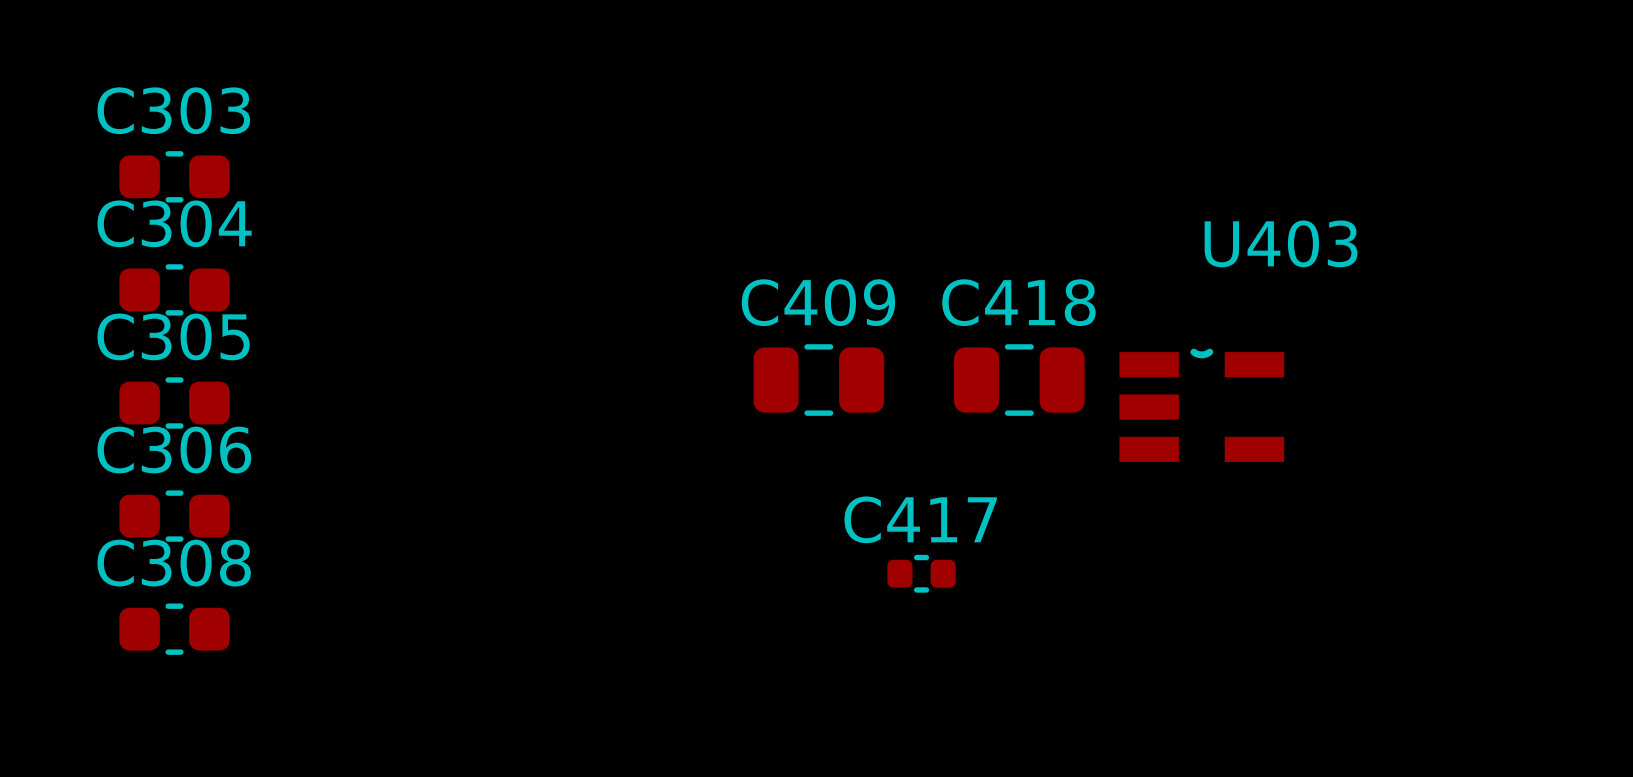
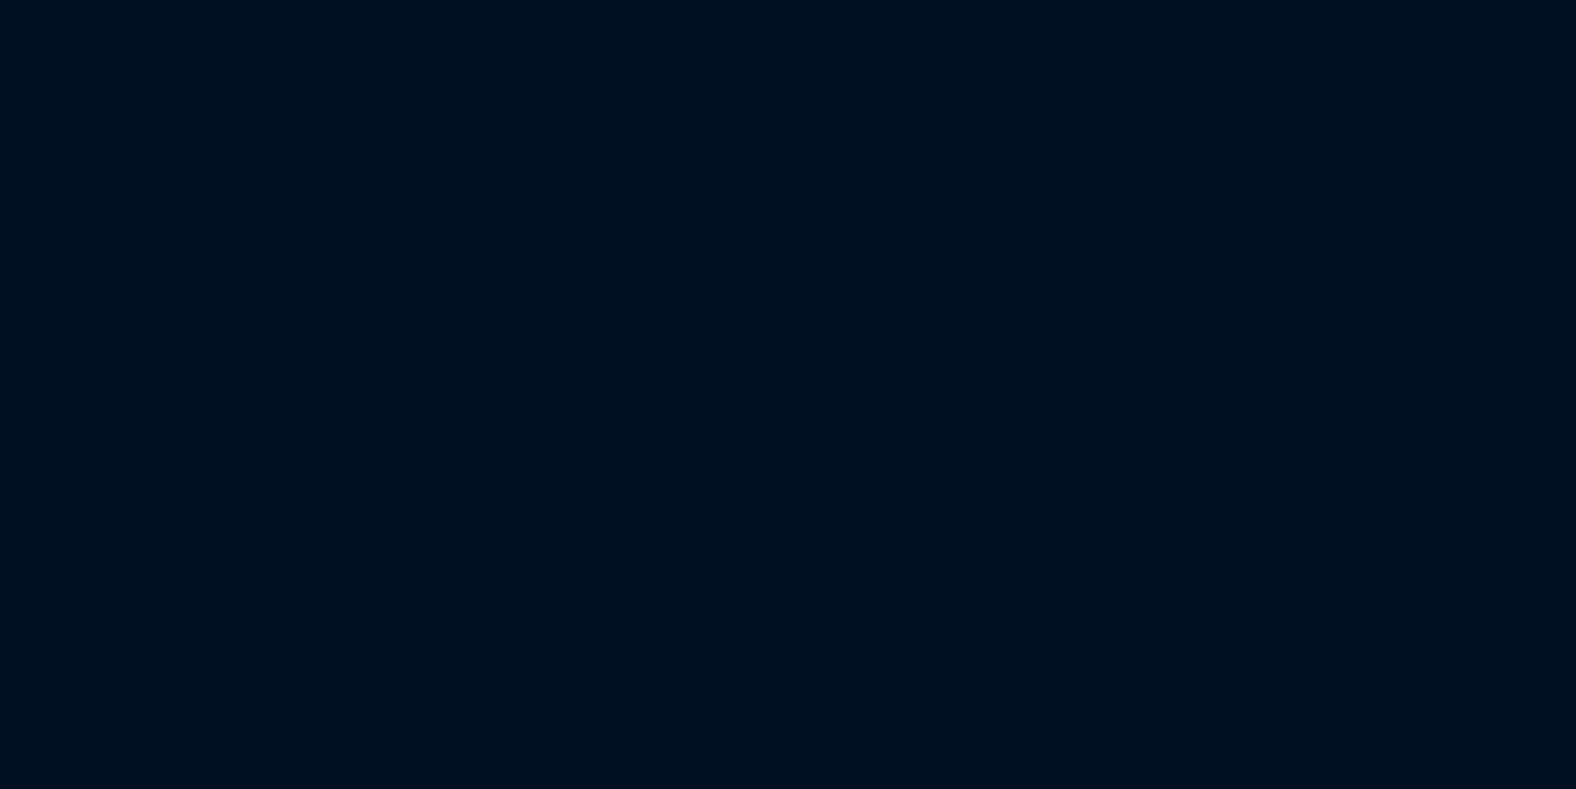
C303: (174, 176) -> none
C304: (174, 289) -> none
C409: (818, 380) -> none
C418: (1019, 380) -> none
C305: (174, 402) -> none
U403: (1201, 405) -> none
C306: (174, 516) -> none
C417: (921, 573) -> none
C308: (174, 629) -> none

